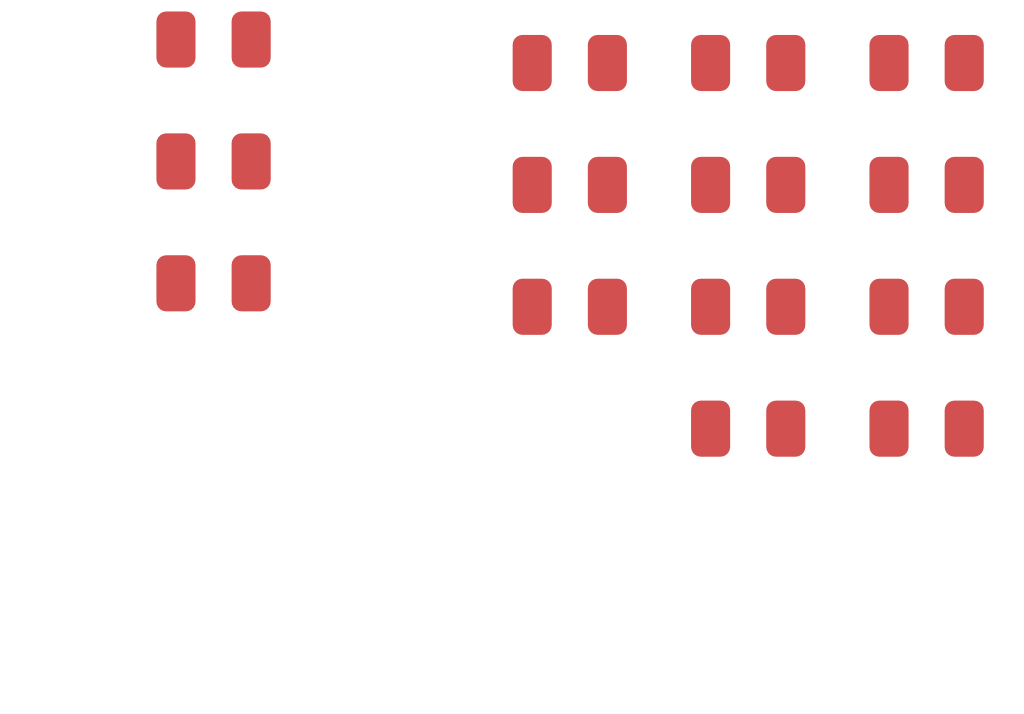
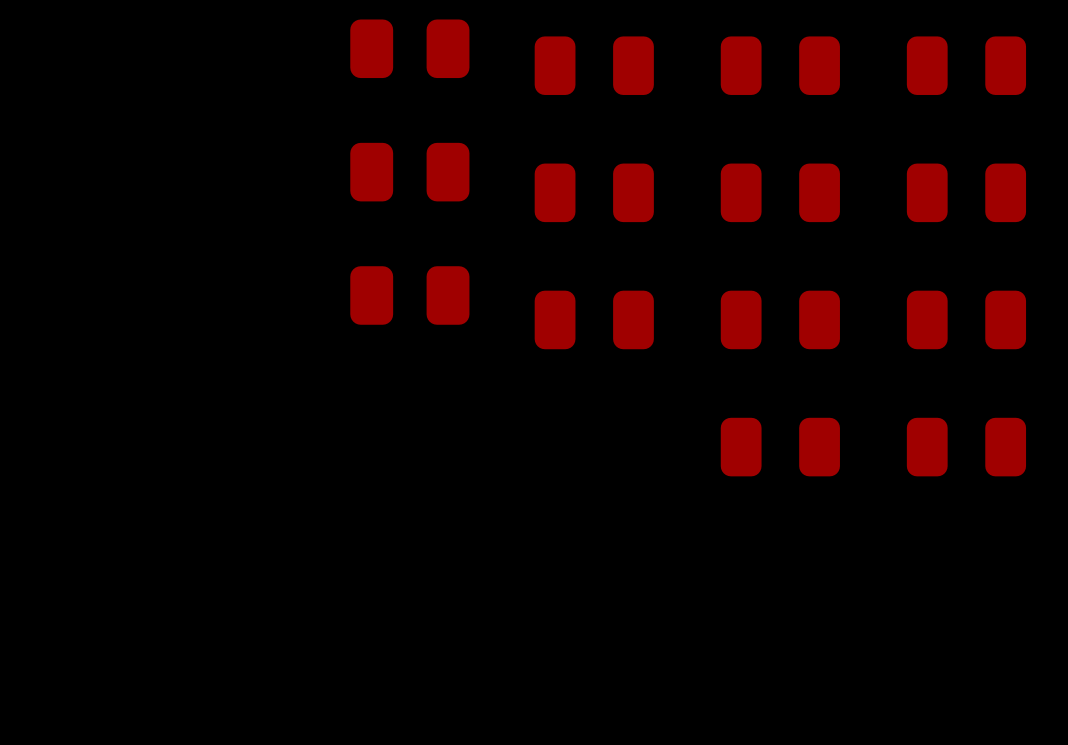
part: (213, 39) -> none
part: none -> (409, 48)
part: (213, 161) -> none
part: none -> (409, 172)
part: (213, 283) -> none
part: none -> (409, 295)

